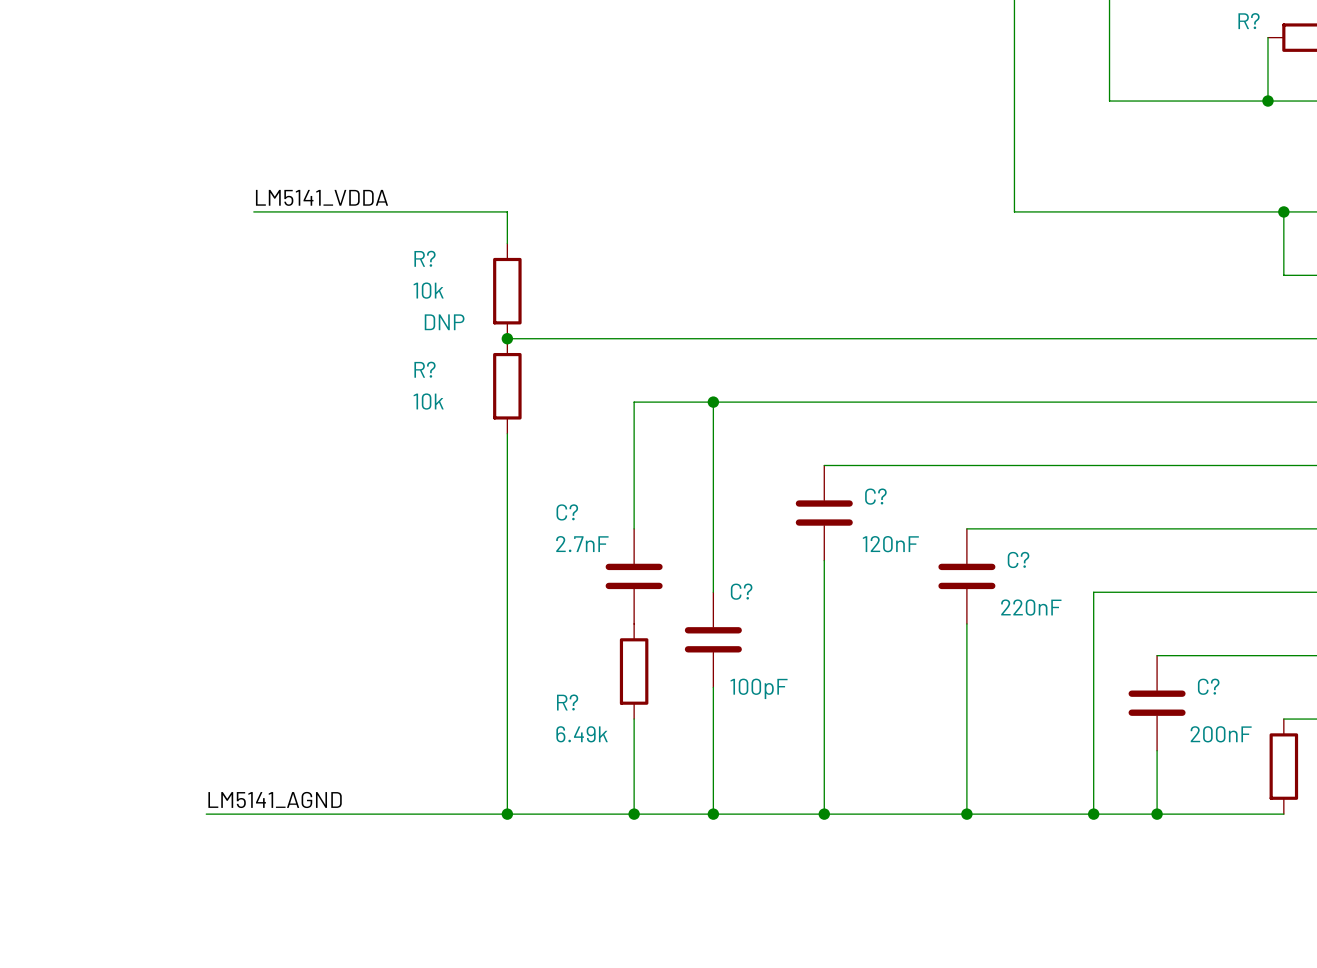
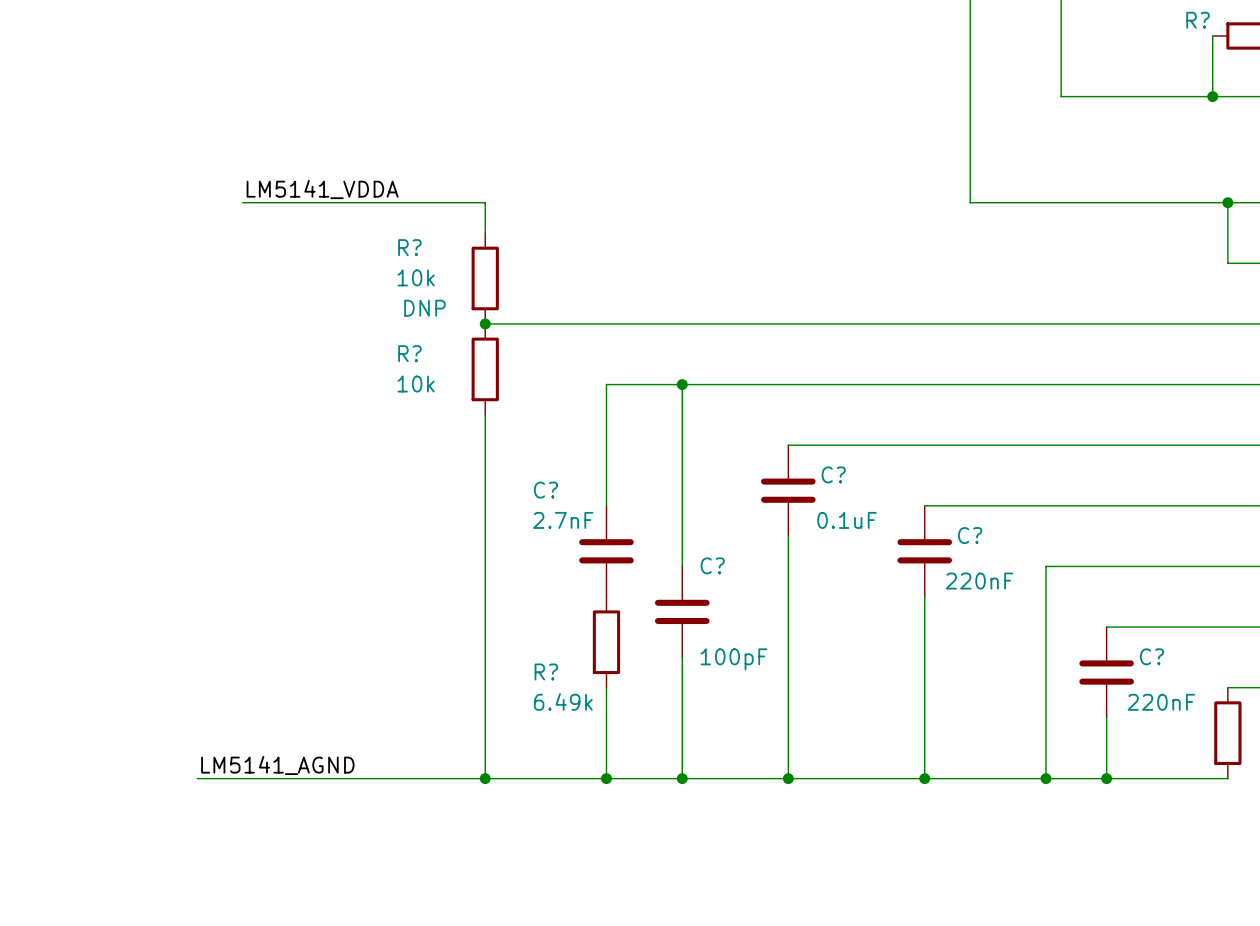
C? value: 120nF (890, 544) -> 0.1uF (847, 520)
C? value: 200nF (1221, 734) -> 220nF (1161, 702)

